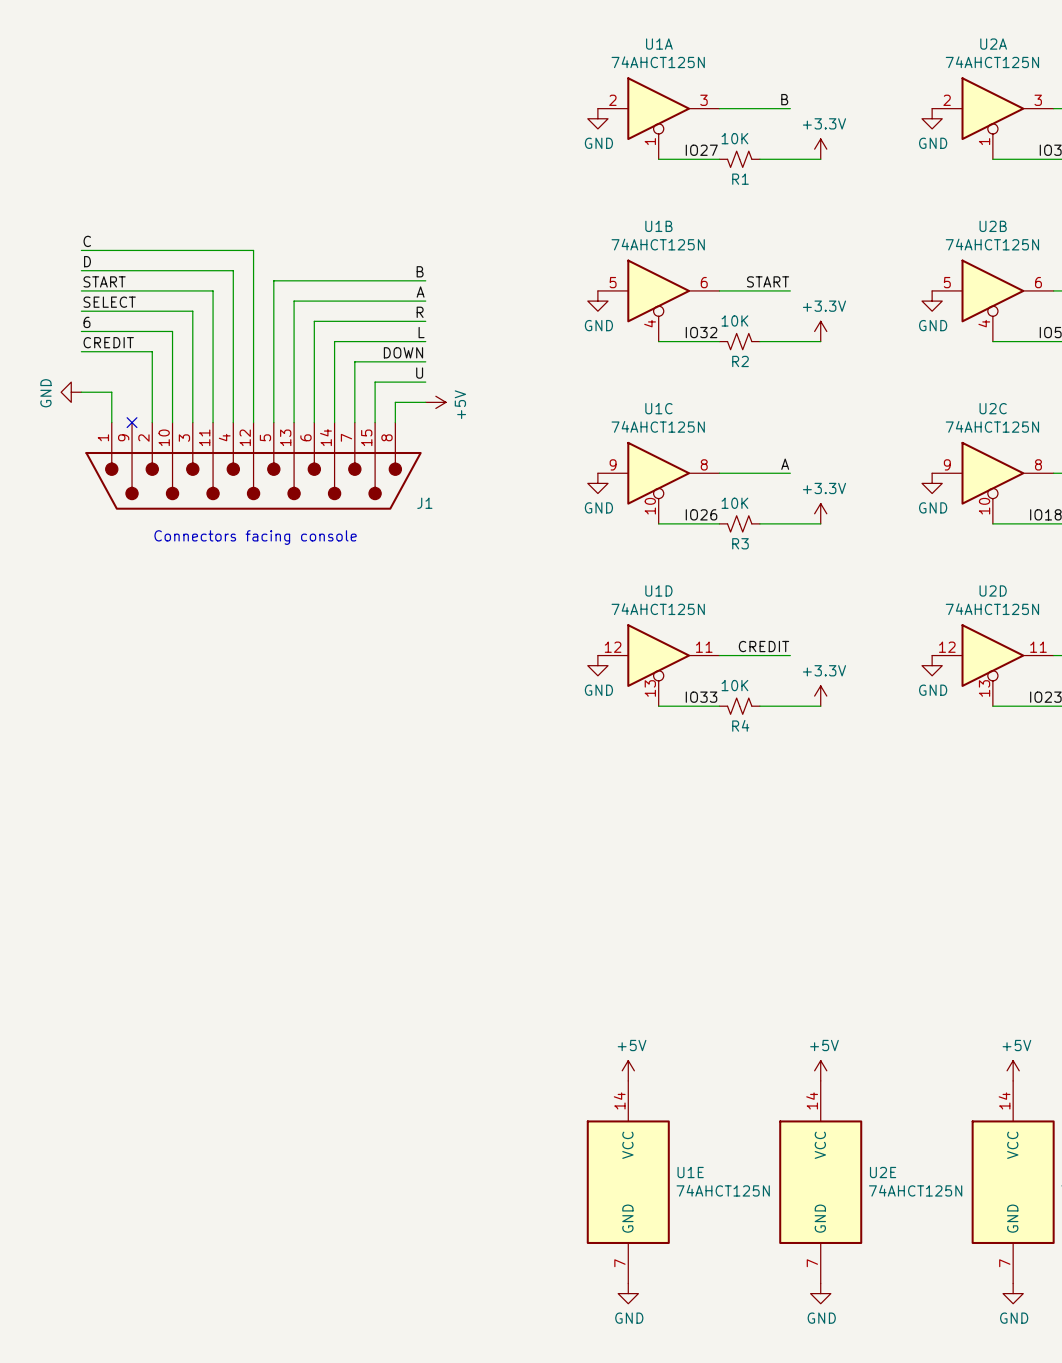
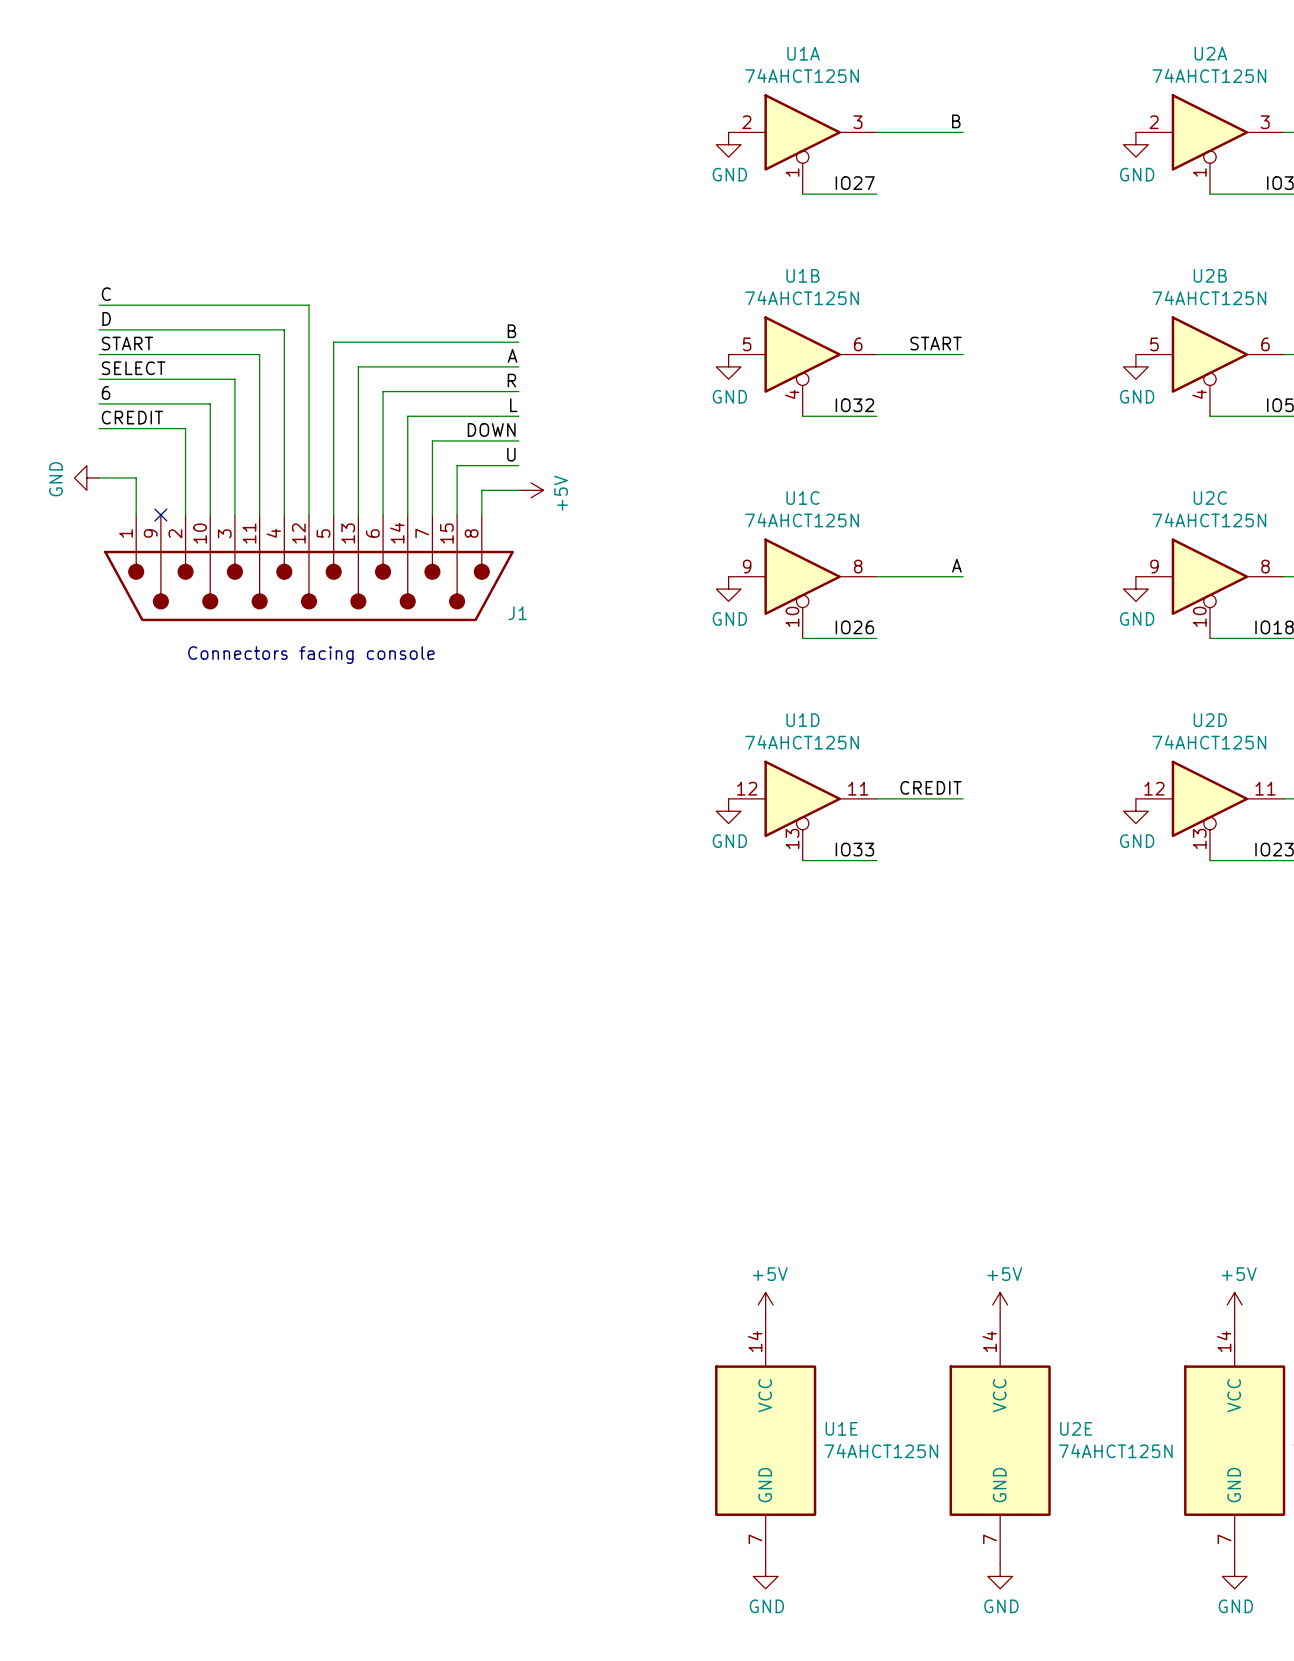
power symbol: +3.3V (820, 149) -> none
R1: 10K (739, 159) -> none
wire: (759, 159) (820, 159) -> none
power symbol: +3.3V (820, 331) -> none
R2: 10K (739, 341) -> none
wire: (759, 341) (820, 341) -> none
power symbol: +3.3V (820, 513) -> none
R3: 10K (739, 523) -> none
wire: (759, 523) (820, 523) -> none
power symbol: +3.3V (820, 696) -> none
R4: 10K (739, 706) -> none
wire: (759, 706) (820, 706) -> none

